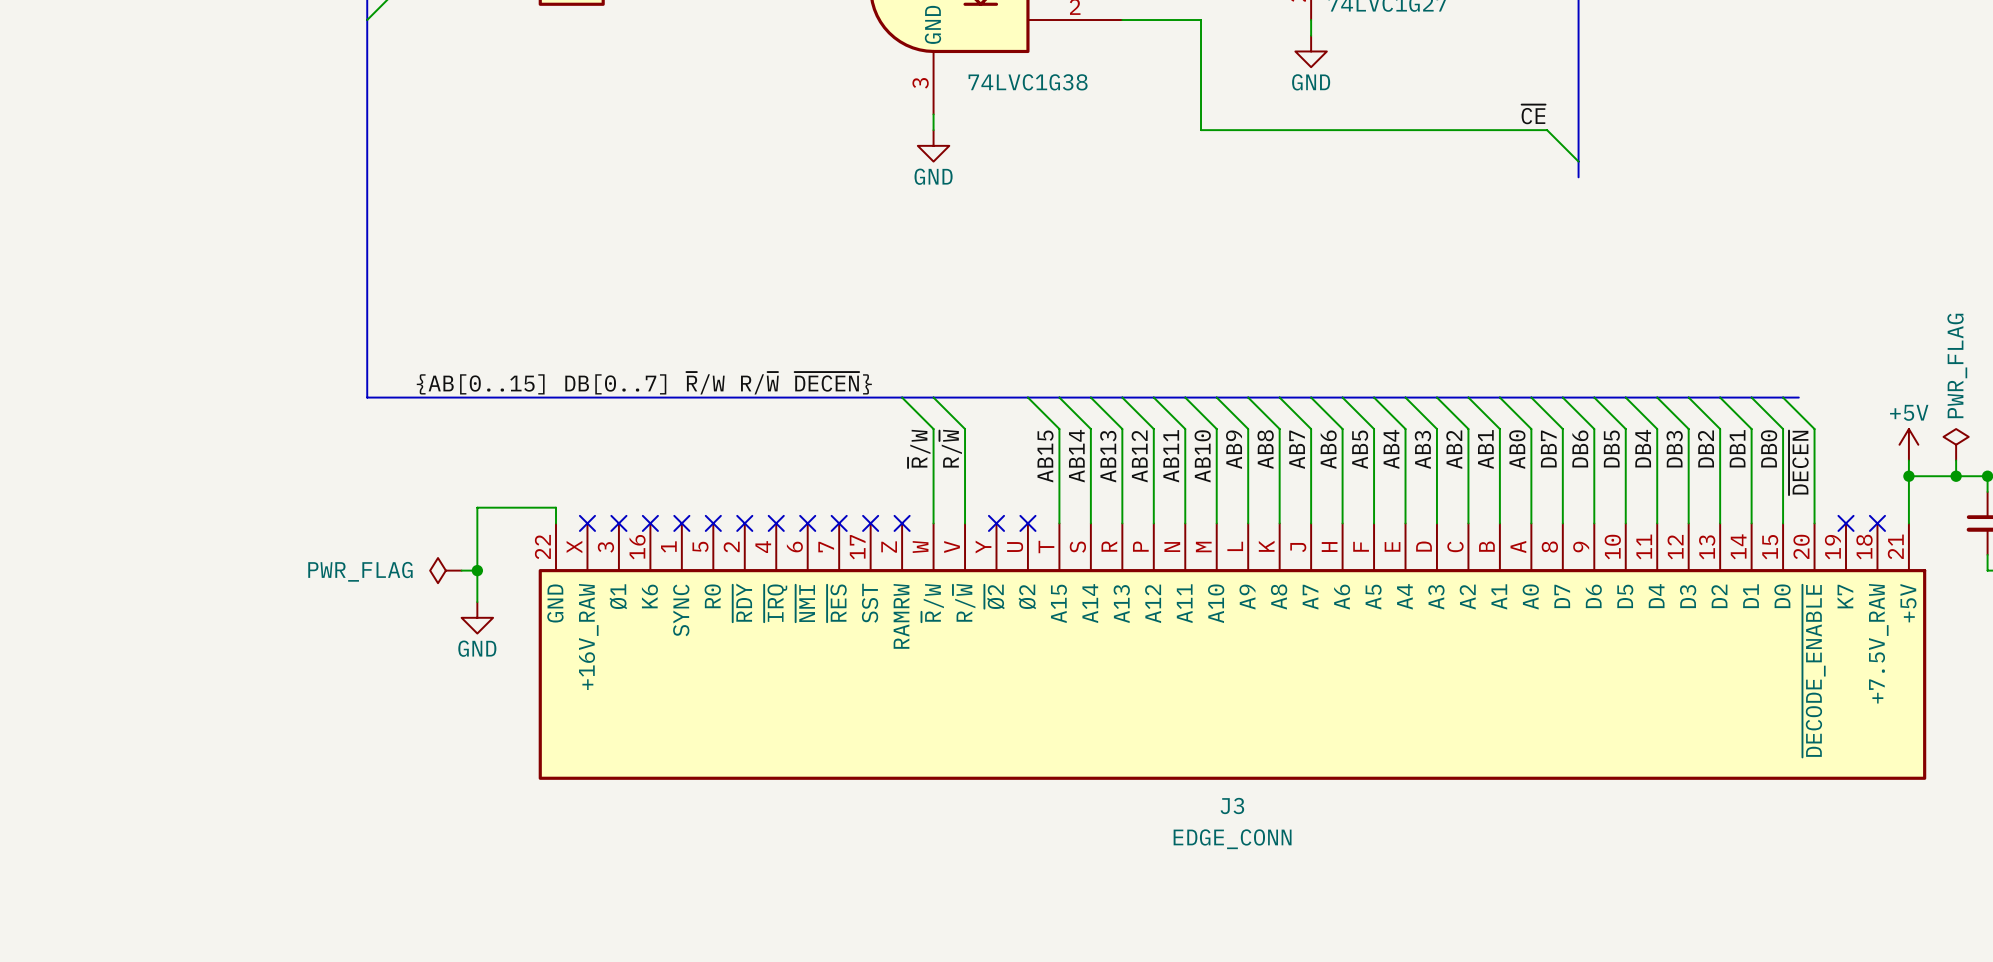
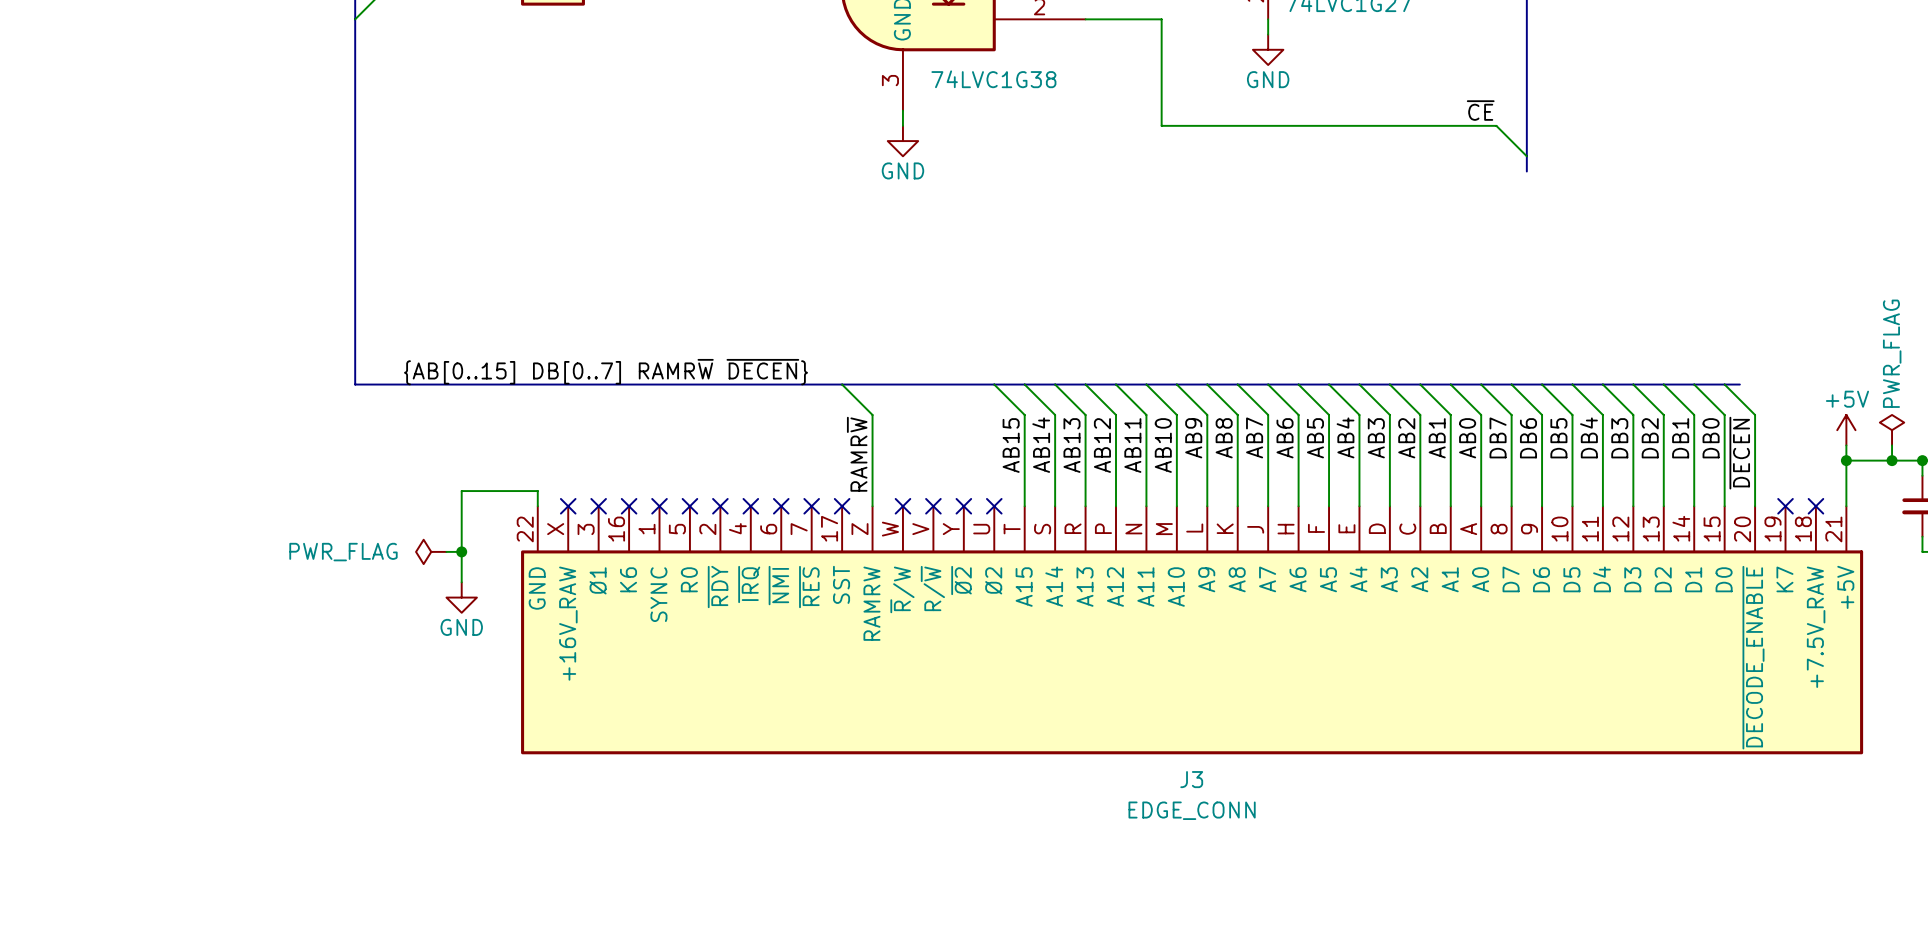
label: {AB[0..15] DB[0..7] ~{R}/W R/~{W} ~{DECEN}} (644, 383) -> {AB[0..15] DB[0..7] RAMR~{W} ~{DECEN}} (606, 372)
wire: (902, 397) (933, 429) (933, 523) -> (842, 384) (872, 414) (872, 506)
wire: (933, 397) (965, 429) (965, 523) -> none
label: ~{R}/W (919, 448) -> none
label: R/~{W} (950, 448) -> none
label: none -> RAMR~{W} (857, 454)
no-connect mark: (902, 523) -> none
no-connect mark: none -> (902, 506)
no-connect mark: none -> (933, 506)

